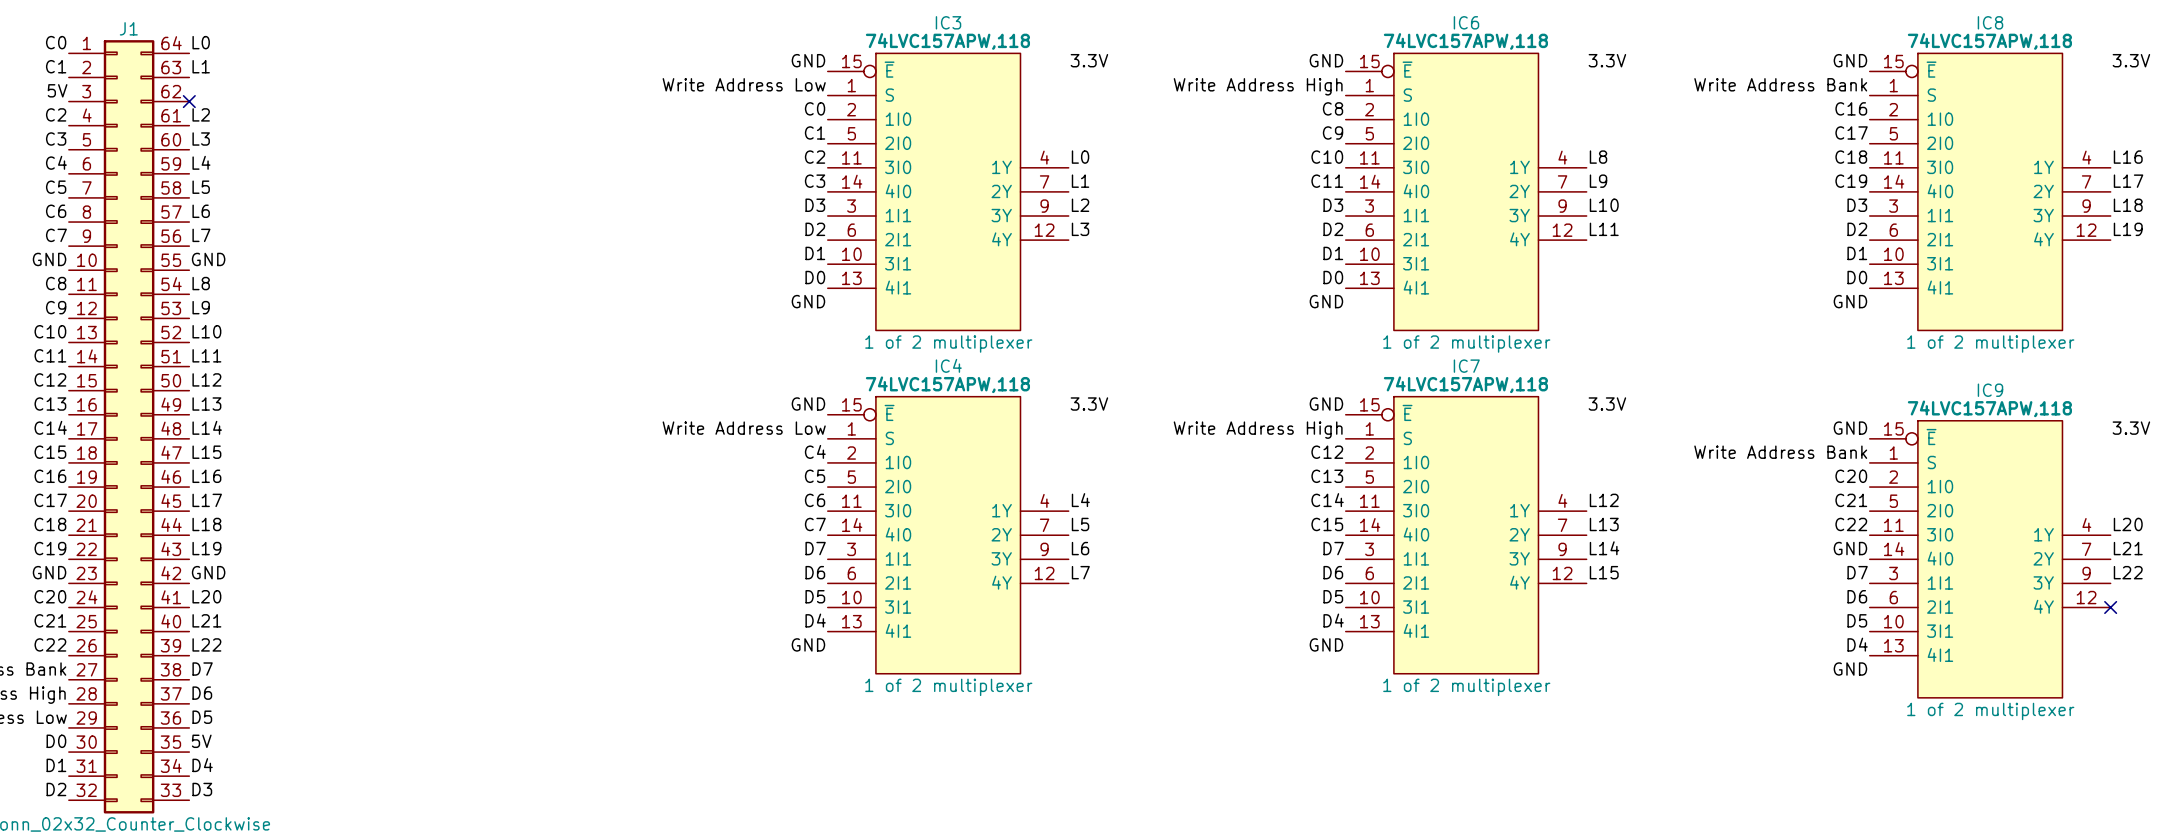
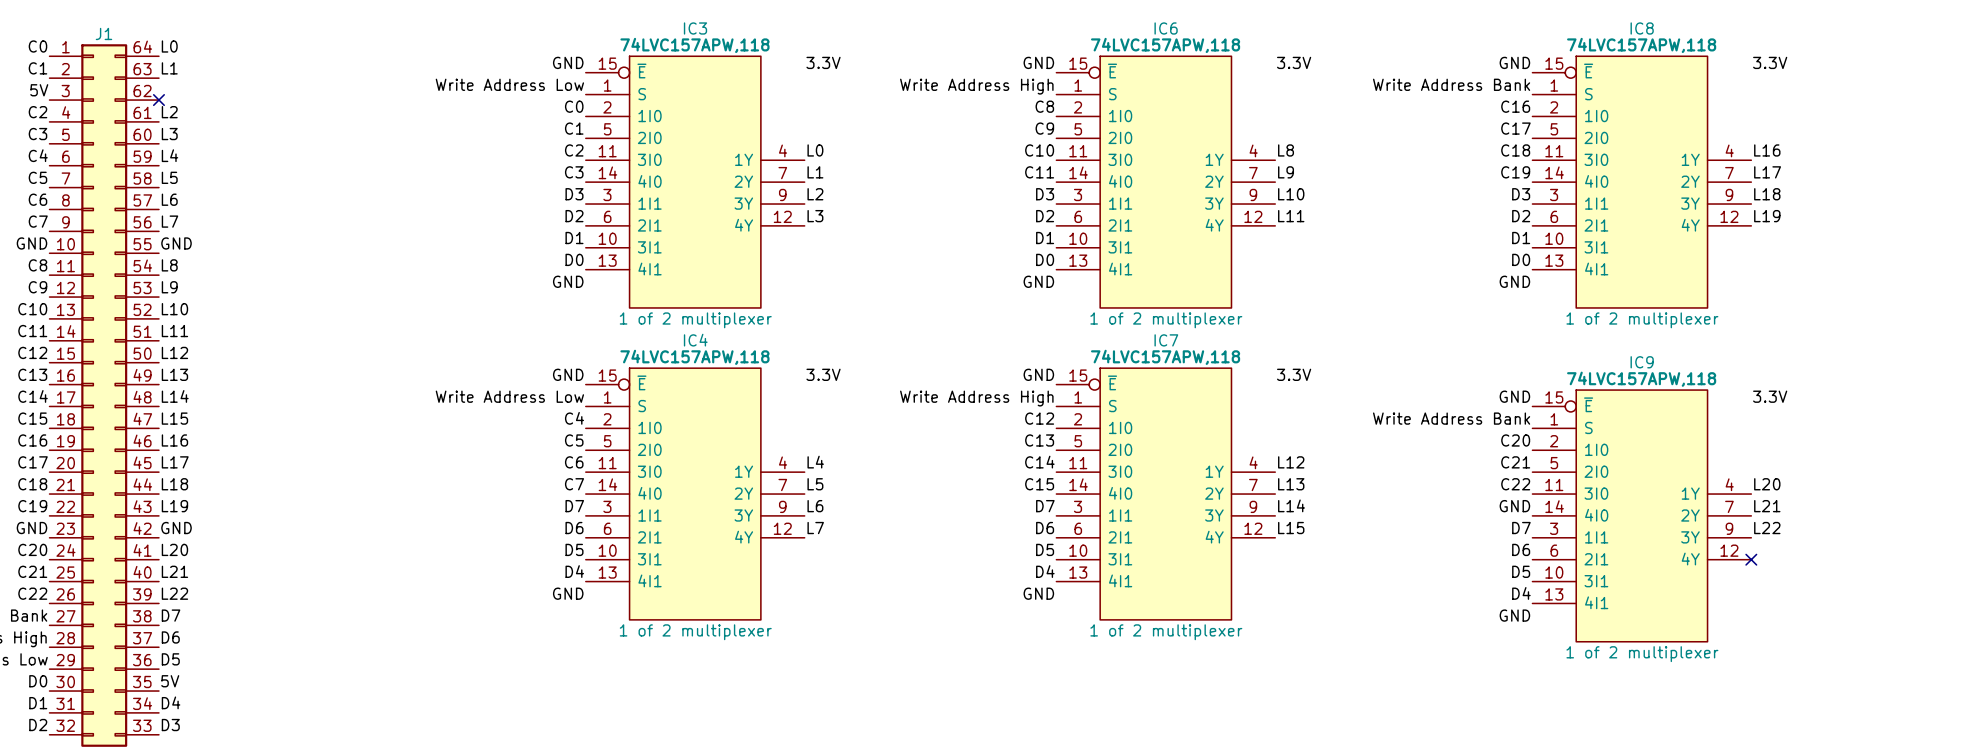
label: none -> GND (568, 62)
label: GND (808, 60) -> none
label position: 3.3V (1089, 60) -> 3.3V (823, 62)
label: none -> GND (1038, 62)
label: GND (1326, 60) -> none
label position: 3.3V (1607, 60) -> 3.3V (1294, 62)
label: none -> GND (1514, 62)
label: GND (1850, 60) -> none
label position: 3.3V (2131, 60) -> 3.3V (1770, 62)
label position: Write Address Low (744, 84) -> Write Address Low (509, 84)
label position: Write Address Bank (1780, 84) -> Write Address Bank (1451, 84)
label position: Write Address High (1258, 86) -> Write Address High (976, 86)
label position: C0 (815, 108) -> C0 (574, 106)
label position: C8 (1333, 108) -> C8 (1044, 106)
label position: C16 (1851, 108) -> C16 (1515, 106)
label position: C1 (815, 132) -> C1 (574, 128)
label position: C9 (1333, 132) -> C9 (1044, 128)
label position: C17 (1851, 132) -> C17 (1515, 128)
label position: C2 (815, 157) -> C2 (574, 150)
label position: L0 (1080, 157) -> L0 (815, 150)
label position: C10 (1327, 157) -> C10 (1039, 150)
label position: L8 (1598, 157) -> L8 (1286, 150)
label position: C18 (1851, 157) -> C18 (1515, 150)
label position: L16 (2128, 157) -> L16 (1767, 150)
label position: C3 (815, 181) -> C3 (574, 172)
label position: L1 (1080, 181) -> L1 (815, 172)
label position: C11 (1327, 181) -> C11 (1039, 172)
label position: L9 (1598, 181) -> L9 (1286, 172)
label position: C19 (1851, 181) -> C19 (1515, 172)
label position: L17 (2128, 181) -> L17 (1767, 172)
IC3 position: (948, 191) -> (695, 182)
IC6 position: (1466, 191) -> (1165, 182)
IC8 position: (1990, 191) -> (1641, 182)
label position: D3 (815, 205) -> D3 (574, 194)
label position: L2 (1080, 205) -> L2 (815, 194)
label position: D3 (1333, 205) -> D3 (1045, 194)
label position: L10 (1604, 205) -> L10 (1291, 194)
label position: D3 (1857, 205) -> D3 (1521, 194)
label position: L18 (2128, 205) -> L18 (1767, 194)
label position: D2 (815, 229) -> D2 (574, 216)
label position: L3 (1080, 229) -> L3 (815, 216)
label position: D2 (1333, 229) -> D2 (1045, 216)
label position: L11 (1604, 229) -> L11 (1291, 216)
label position: D2 (1857, 229) -> D2 (1521, 216)
label position: L19 (2128, 229) -> L19 (1767, 216)
label position: D1 (815, 253) -> D1 (574, 238)
label position: D1 (1333, 253) -> D1 (1045, 238)
label position: D1 (1857, 253) -> D1 (1521, 238)
label position: D0 (815, 277) -> D0 (574, 259)
label position: D0 (1333, 277) -> D0 (1045, 259)
label position: D0 (1857, 277) -> D0 (1521, 259)
label: none -> GND (568, 281)
label: GND (808, 301) -> none
label: none -> GND (1038, 281)
label: GND (1326, 301) -> none
label: none -> GND (1514, 281)
label: GND (1850, 301) -> none
label: none -> GND (568, 374)
label: GND (808, 404) -> none
label position: 3.3V (1089, 404) -> 3.3V (823, 374)
label: none -> GND (1038, 374)
label: GND (1326, 404) -> none
label position: 3.3V (1607, 404) -> 3.3V (1294, 374)
label position: Write Address Low (744, 428) -> Write Address Low (509, 396)
label: none -> GND (1514, 396)
label: GND (1850, 428) -> none
label position: 3.3V (2131, 428) -> 3.3V (1770, 396)
label position: Write Address High (1258, 430) -> Write Address High (976, 398)
label position: C4 (815, 451) -> C4 (574, 418)
label position: C12 (1327, 452) -> C12 (1039, 418)
label position: Write Address Bank (1780, 452) -> Write Address Bank (1451, 418)
label position: C5 (815, 476) -> C5 (574, 440)
label position: C13 (1327, 476) -> C13 (1039, 440)
label position: C20 (1851, 476) -> C20 (1515, 440)
label position: C6 (815, 500) -> C6 (574, 462)
label position: L4 (1080, 500) -> L4 (815, 462)
label position: C14 (1327, 500) -> C14 (1039, 462)
label position: L12 (1604, 500) -> L12 (1291, 462)
label position: C21 (1851, 500) -> C21 (1515, 462)
label position: C7 (815, 524) -> C7 (574, 484)
label position: L5 (1080, 524) -> L5 (815, 484)
label position: C15 (1327, 524) -> C15 (1039, 484)
label position: L13 (1604, 524) -> L13 (1291, 484)
label position: C22 (1851, 524) -> C22 (1515, 484)
label position: L20 (2128, 524) -> L20 (1767, 484)
IC4 position: (948, 535) -> (695, 494)
IC7 position: (1466, 535) -> (1165, 494)
label position: D7 (815, 548) -> D7 (574, 506)
label position: L6 (1080, 548) -> L6 (815, 506)
label position: D7 (1333, 548) -> D7 (1045, 506)
label position: L14 (1604, 548) -> L14 (1291, 505)
label: none -> GND (1514, 506)
label: GND (1850, 548) -> none
label position: L21 (2128, 548) -> L21 (1767, 506)
IC9 position: (1990, 559) -> (1641, 515)
label position: D6 (815, 572) -> D6 (574, 528)
label position: L7 (1080, 572) -> L7 (815, 528)
label position: D6 (1333, 572) -> D6 (1045, 528)
label position: L15 (1604, 572) -> L15 (1291, 528)
label position: D7 (1857, 572) -> D7 (1521, 528)
label position: L22 (2128, 572) -> L22 (1767, 528)
label position: D5 (815, 596) -> D5 (574, 549)
label position: D5 (1333, 596) -> D5 (1045, 549)
label position: D6 (1857, 596) -> D6 (1521, 549)
no-connect mark: none -> (1751, 559)
no-connect mark: (2110, 607) -> none
label position: D4 (815, 620) -> D4 (574, 571)
label position: D4 (1333, 620) -> D4 (1045, 571)
label position: D5 (1857, 620) -> D5 (1521, 571)
label: none -> GND (568, 593)
label: GND (808, 644) -> none
label: none -> GND (1038, 593)
label: GND (1326, 644) -> none
label position: D4 (1857, 644) -> D4 (1521, 593)
label: none -> GND (1514, 615)
label: GND (1850, 669) -> none

